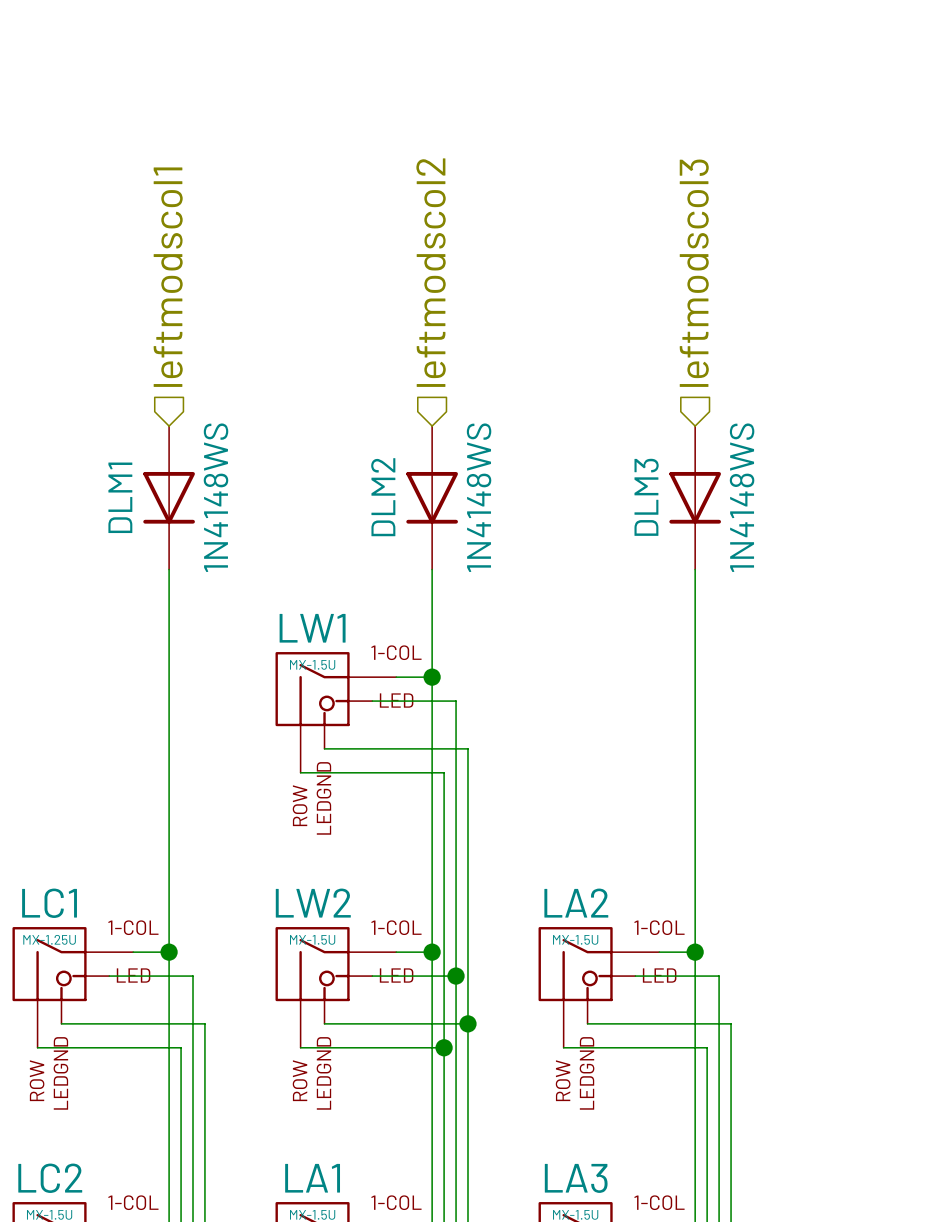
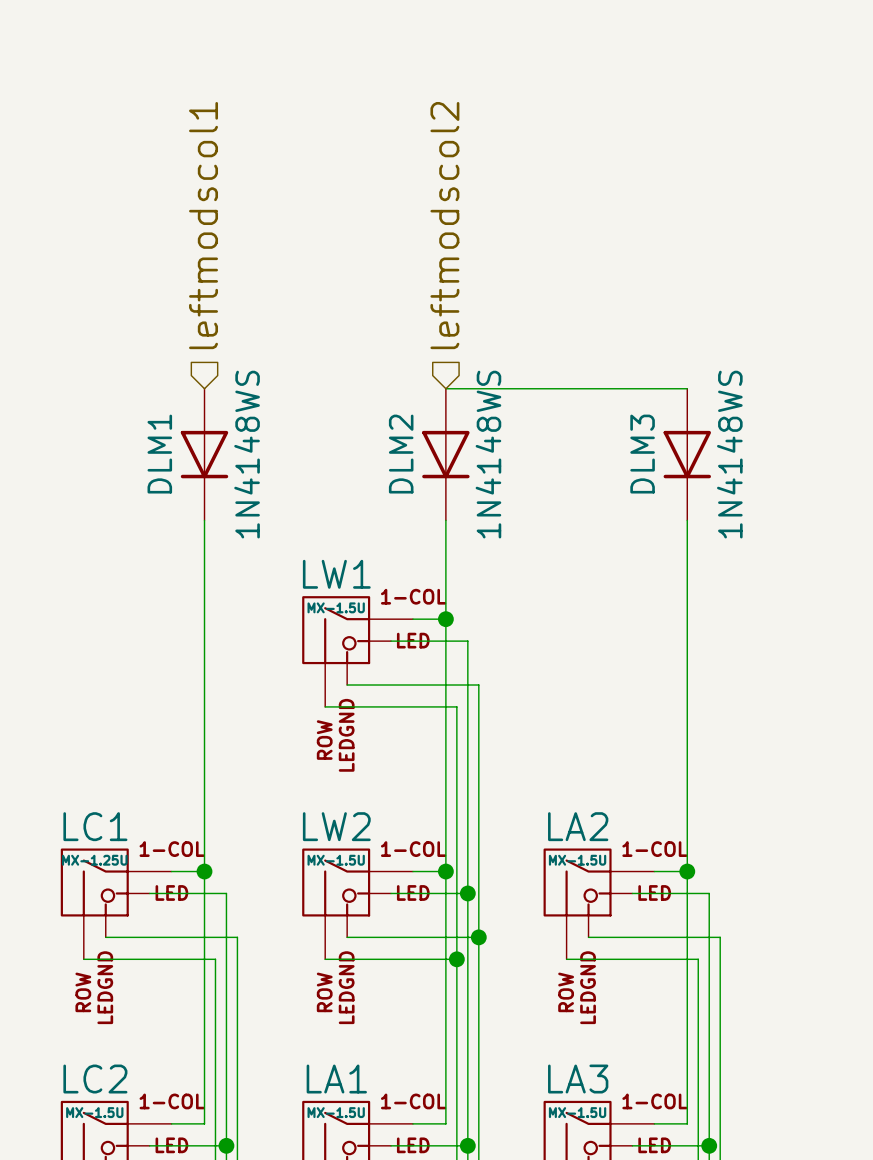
hierarchical label: leftmodscol3 (694, 273) -> none
wire: none -> (445, 388) (687, 388)

